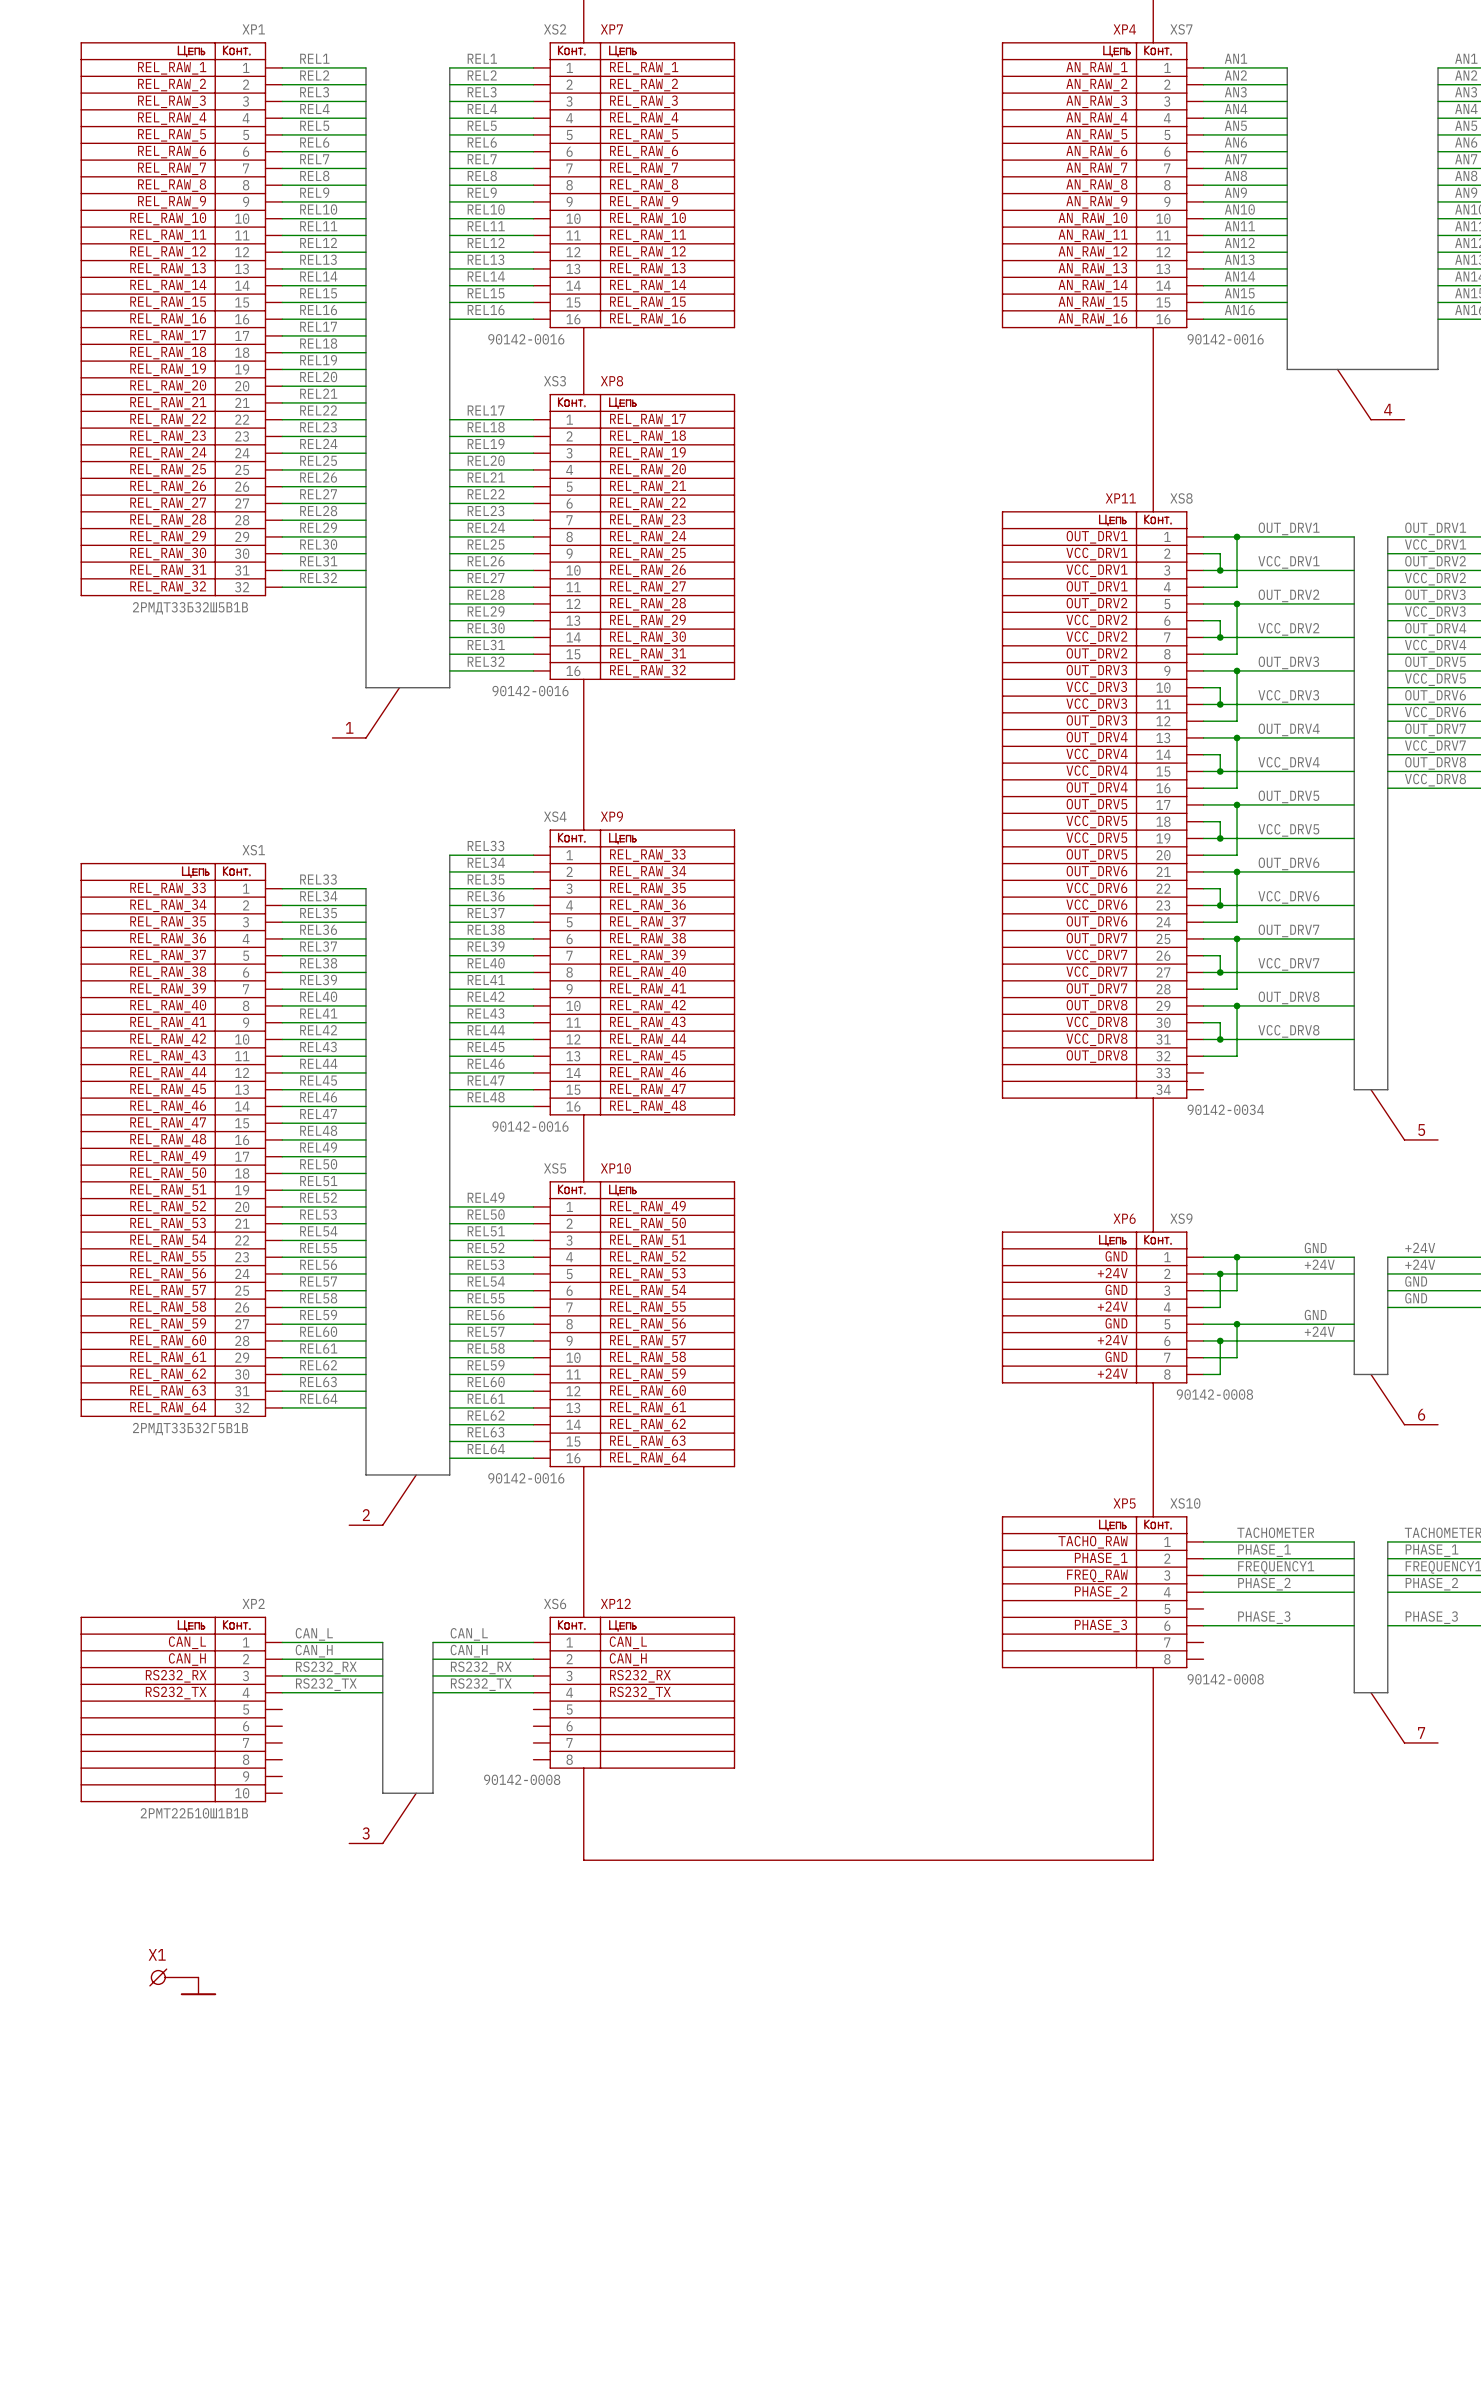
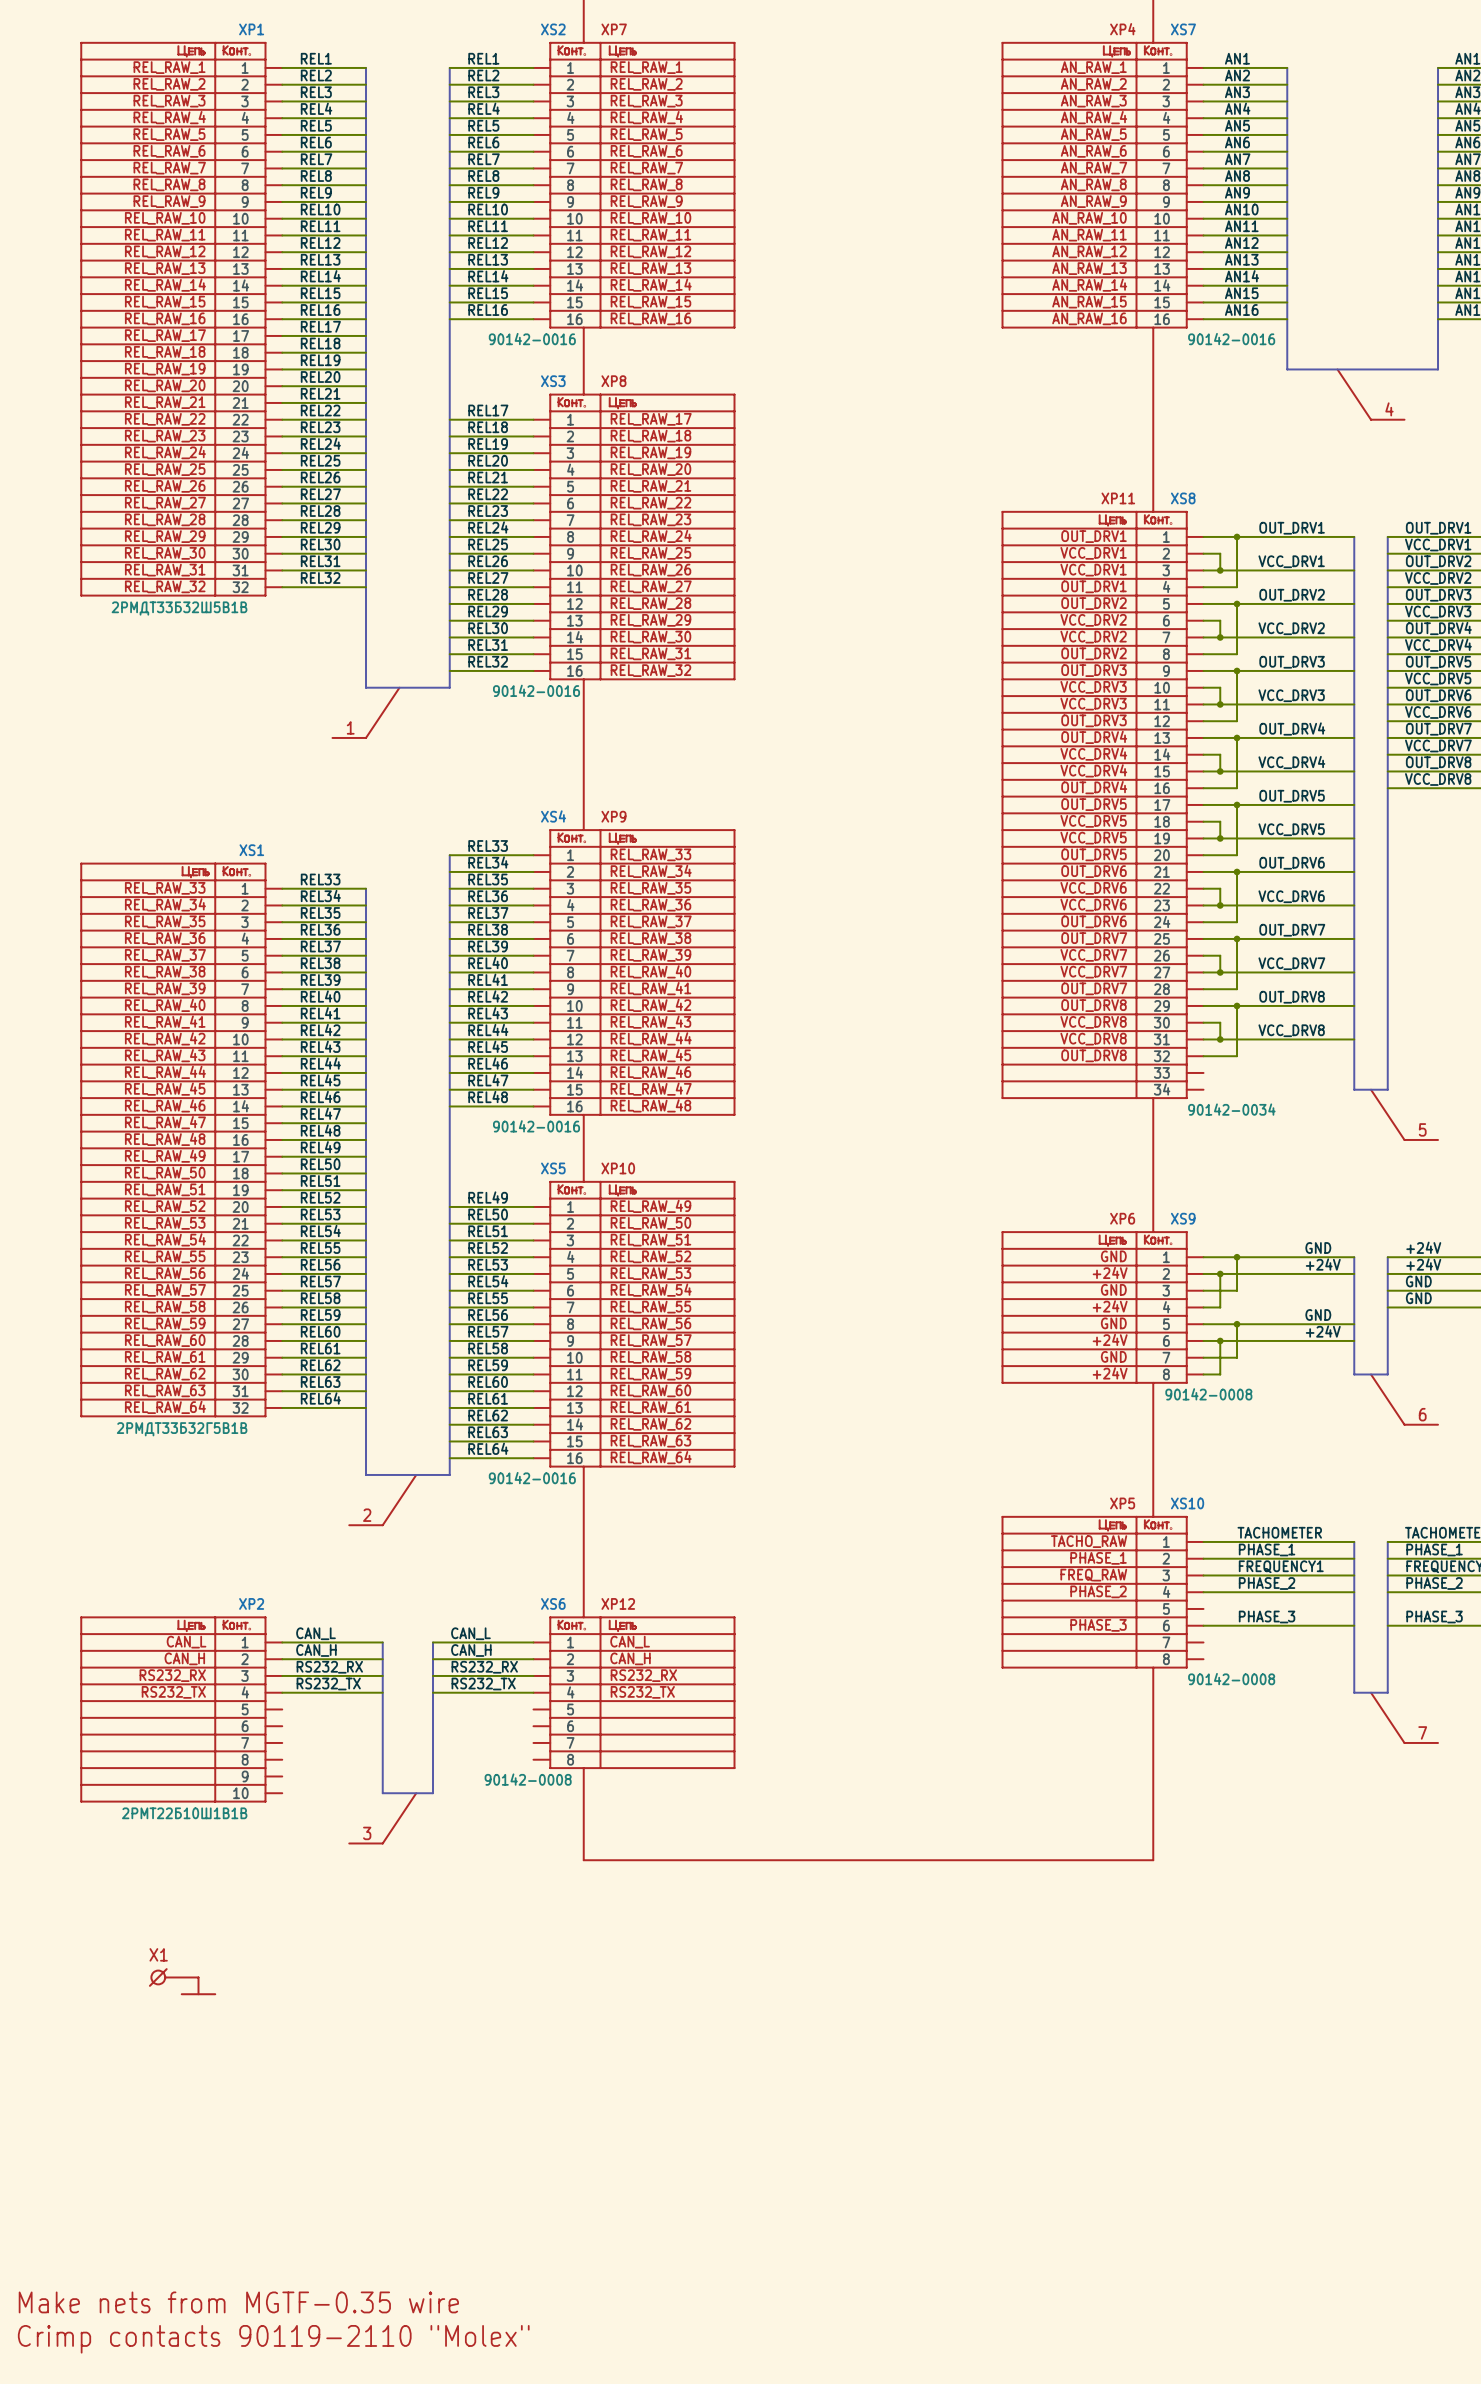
text: none -> Make nets from MGTF-0.35 wire (238, 2302)
text: none -> Crimp contacts 90119-2110 "Molex" (273, 2339)

